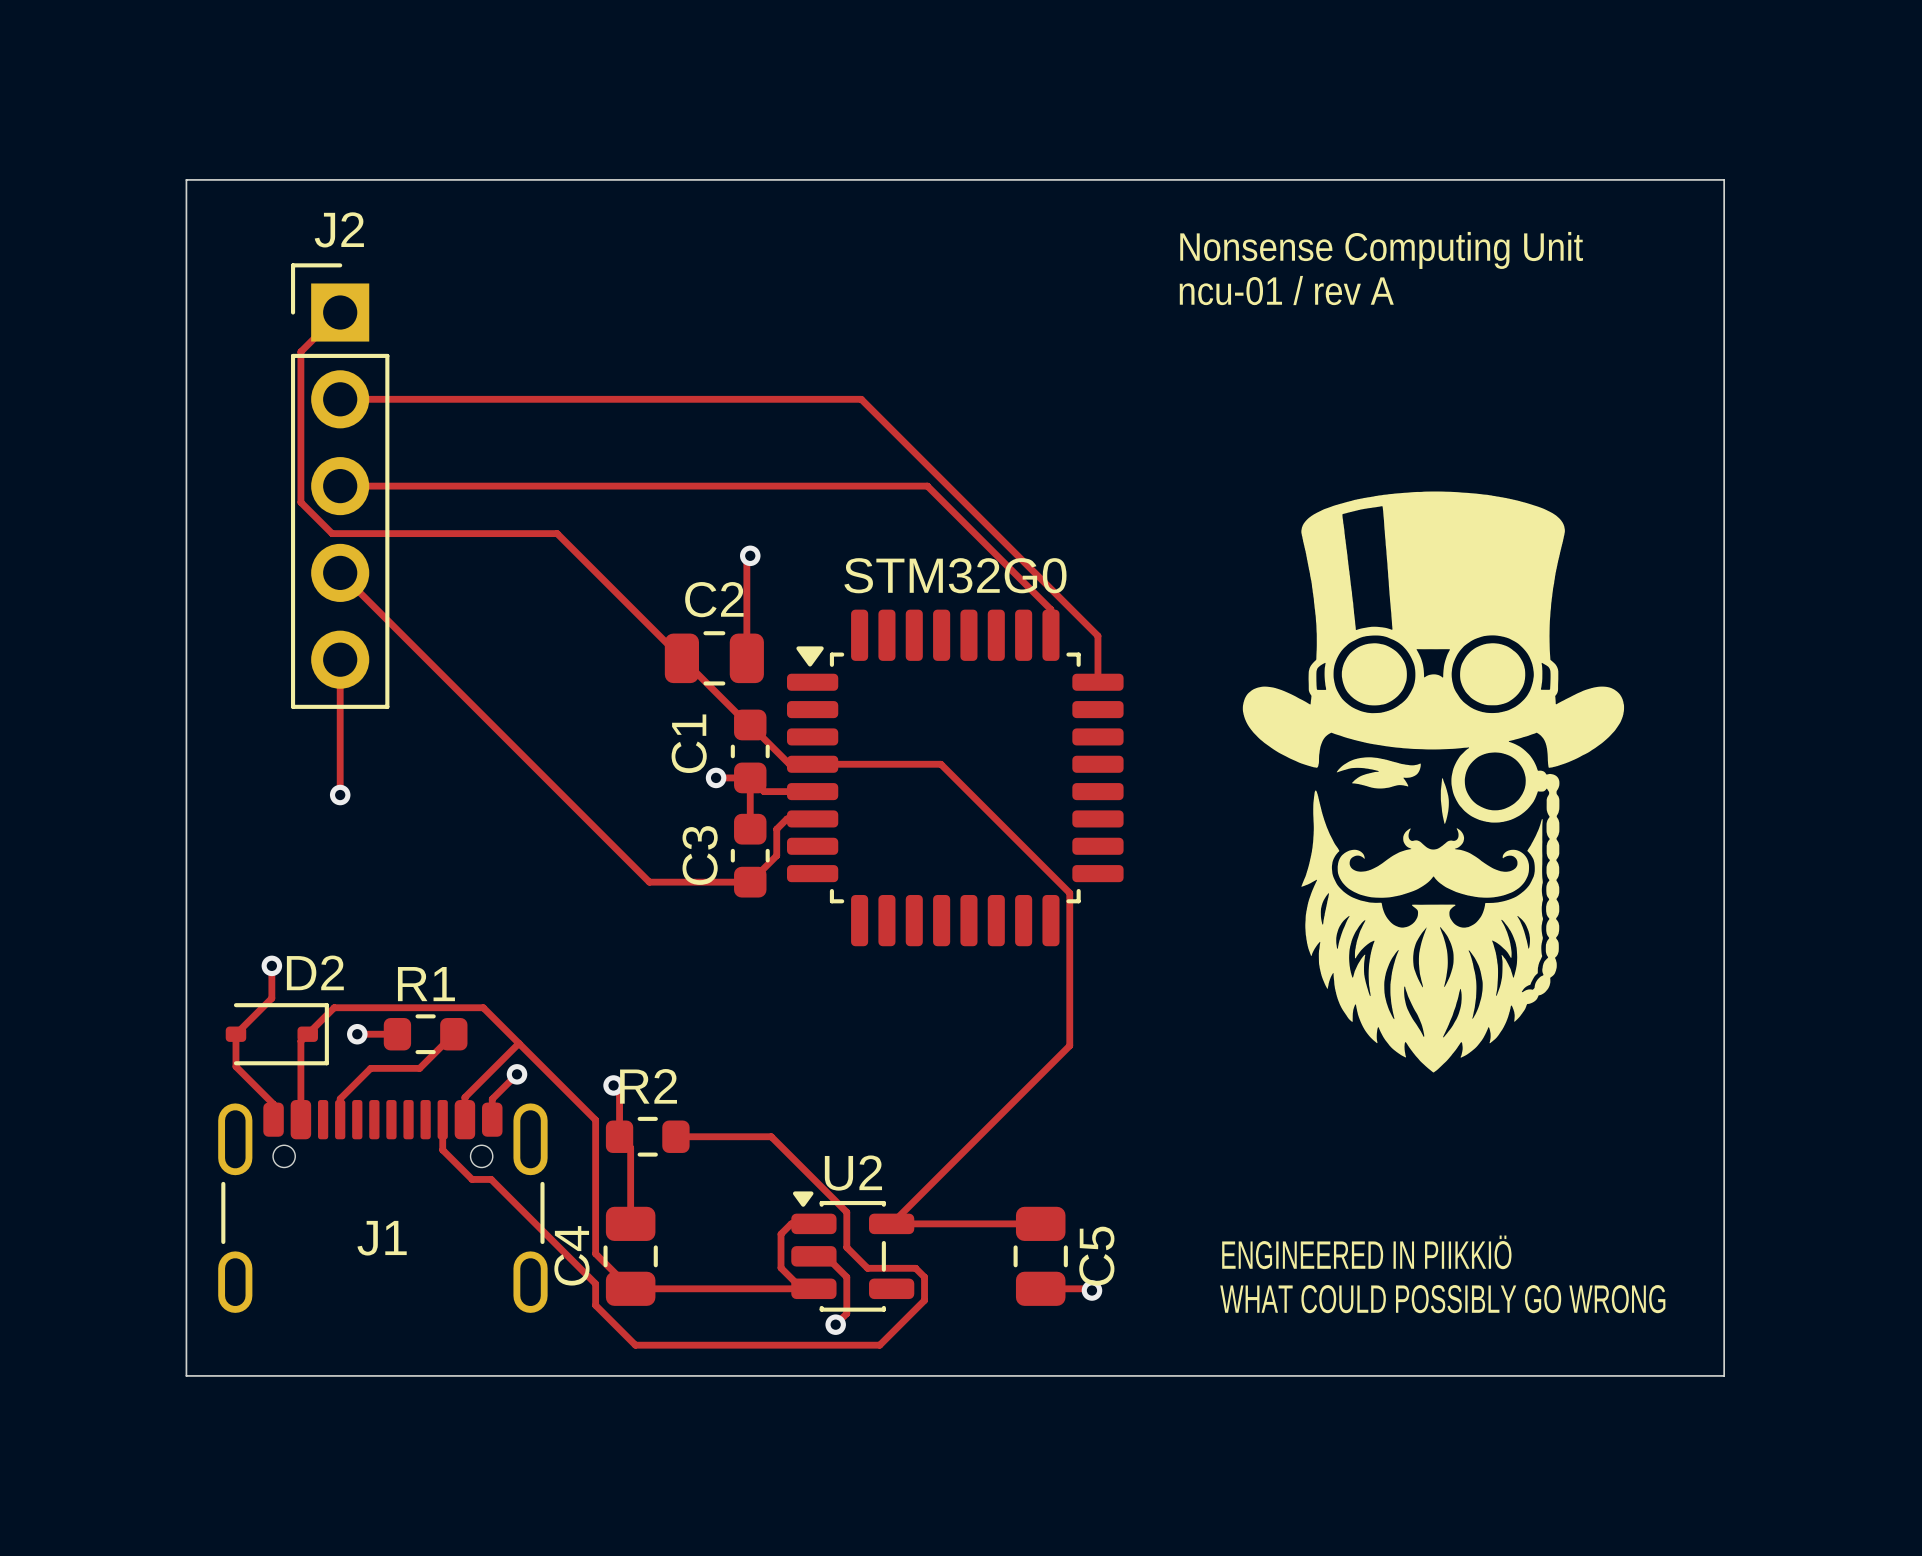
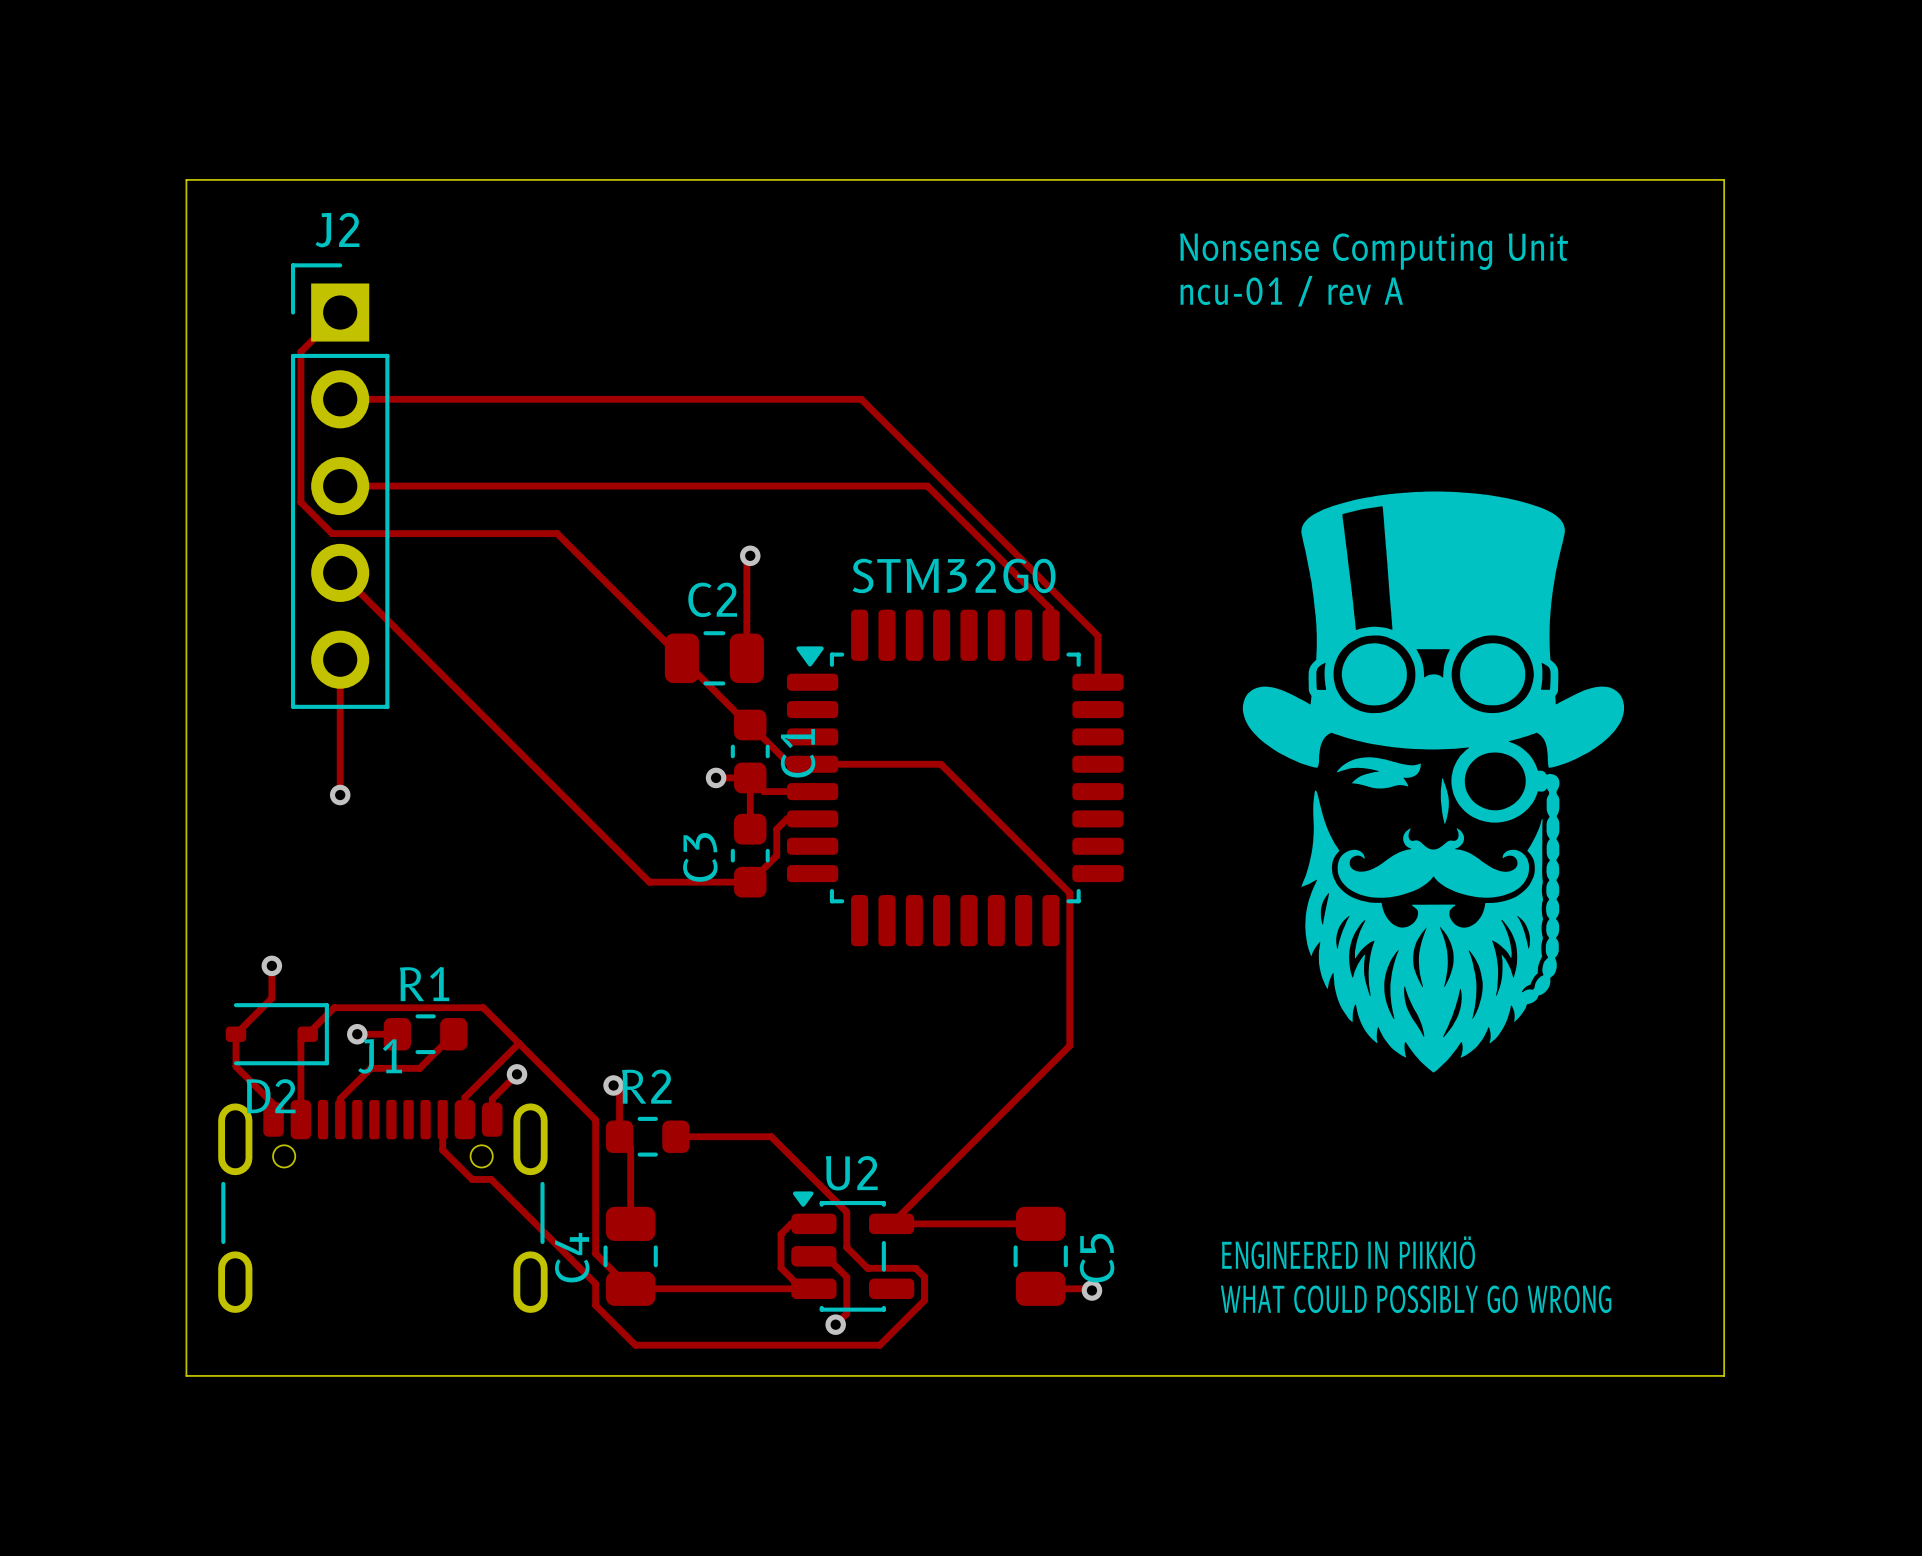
C1 name position: C1 (689, 743) -> C1 (798, 753)
D2 name position: D2 (315, 972) -> D2 (271, 1096)
J1 name position: J1 (382, 1238) -> J1 (380, 1056)

